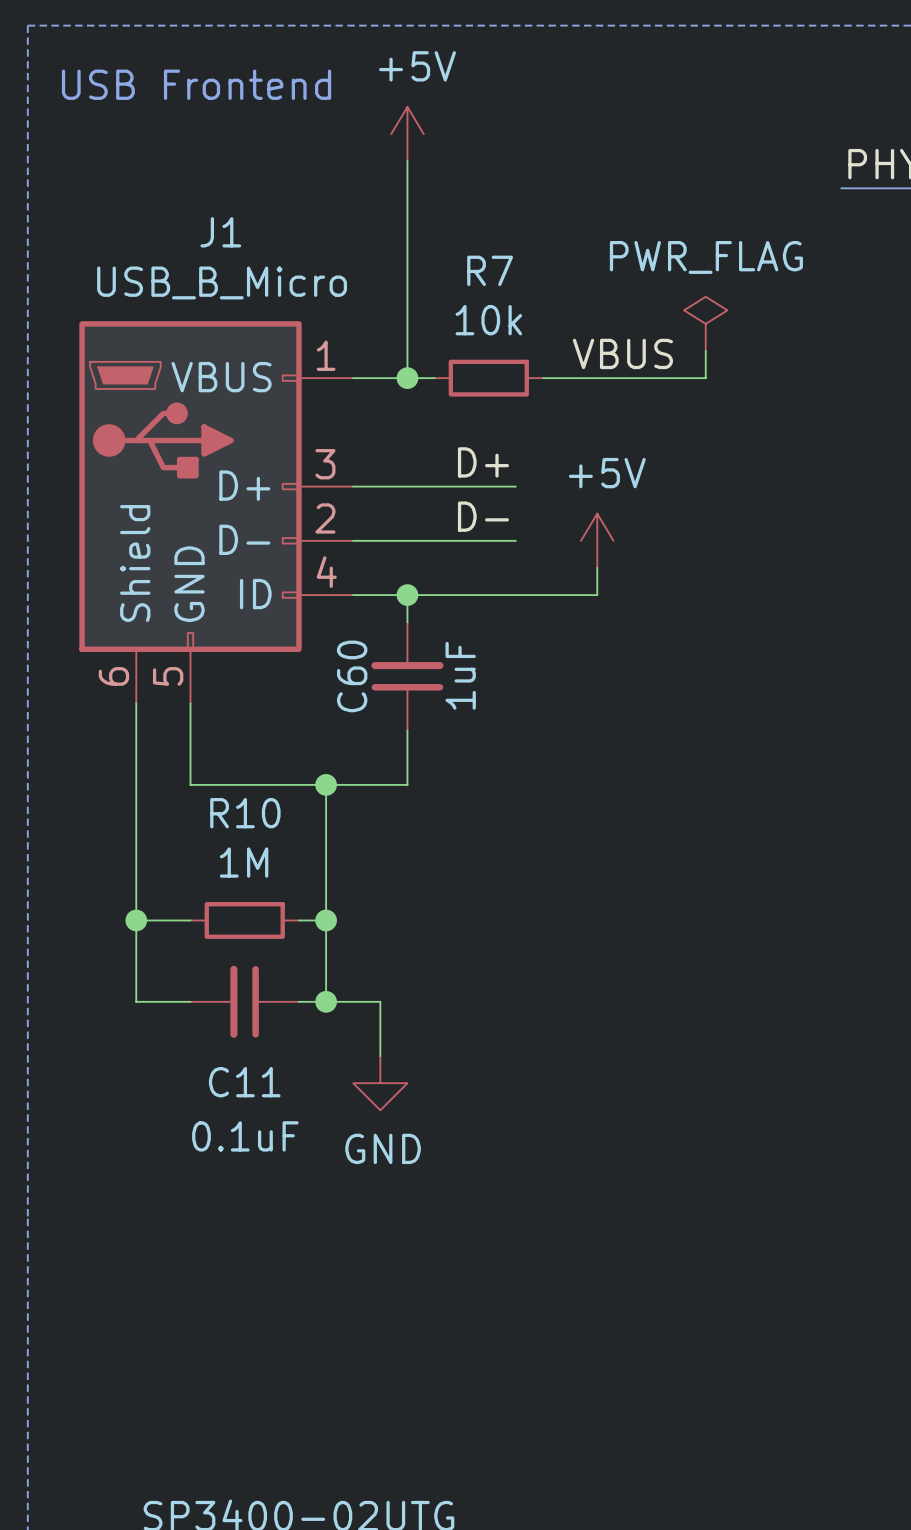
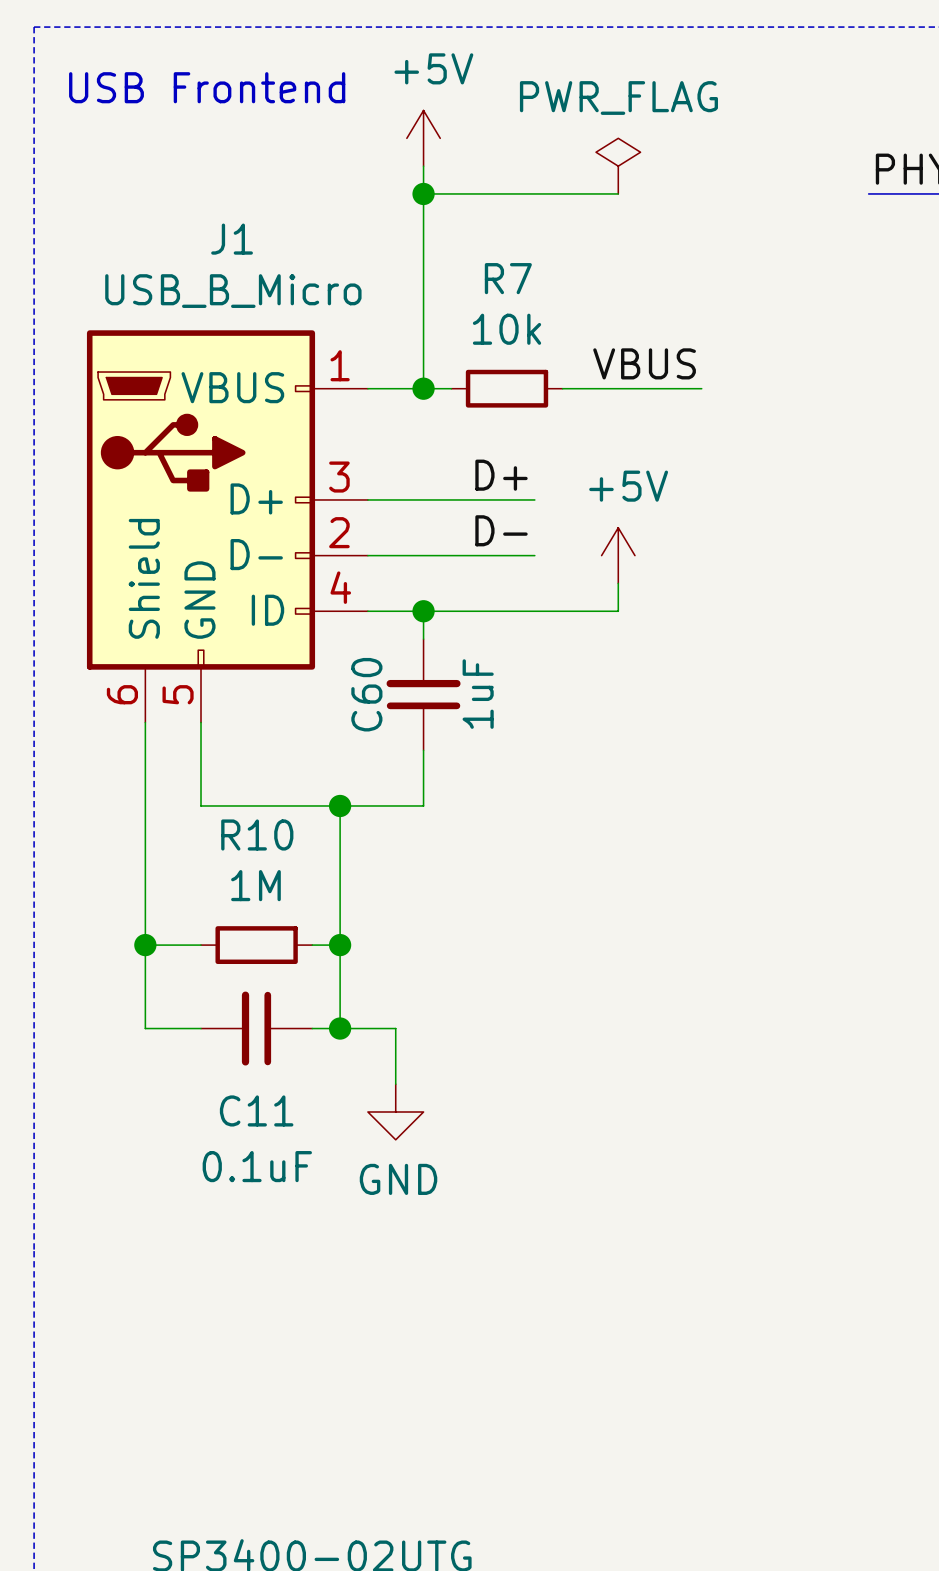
wire: none -> (423, 193) (618, 193)
junction: none -> (423, 193)
power symbol position: PWR_FLAG (705, 323) -> PWR_FLAG (618, 166)
wire: (705, 351) (705, 378) (678, 378) -> none

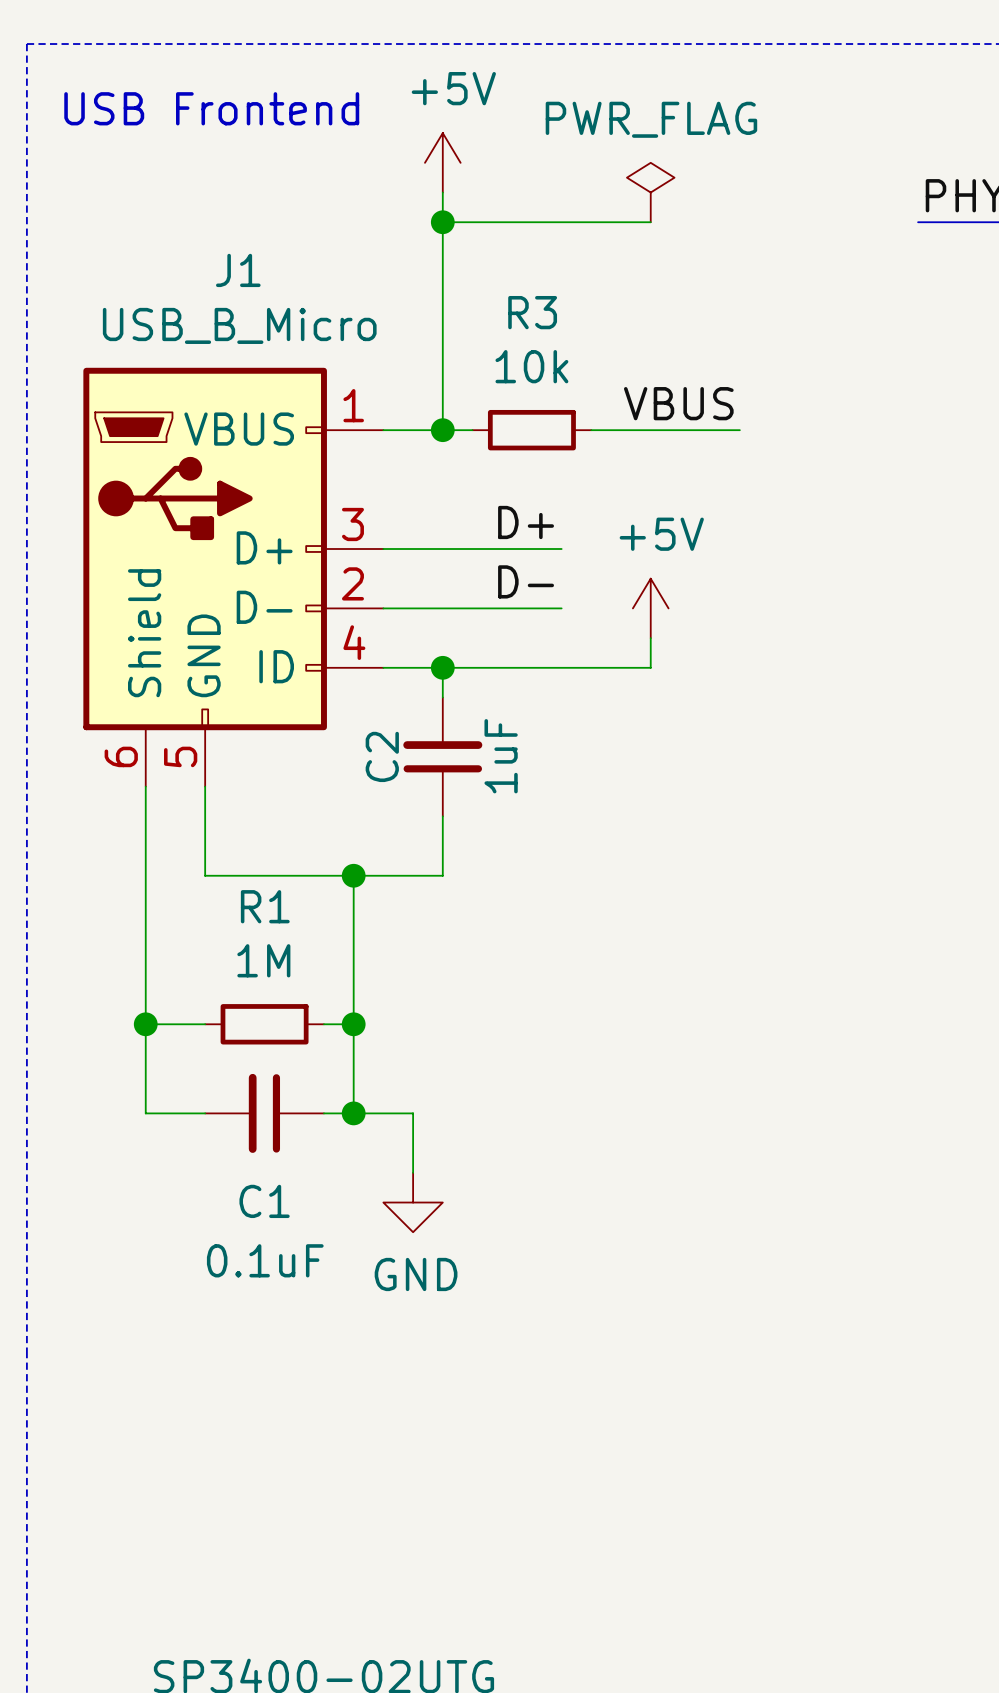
R7 name: R7 (508, 278) -> R3 (532, 312)
C60 name: C60 (366, 694) -> C2 (382, 756)
R10 name: R10 (257, 834) -> R1 (265, 906)
C11 name: C11 (256, 1110) -> C1 (264, 1201)

